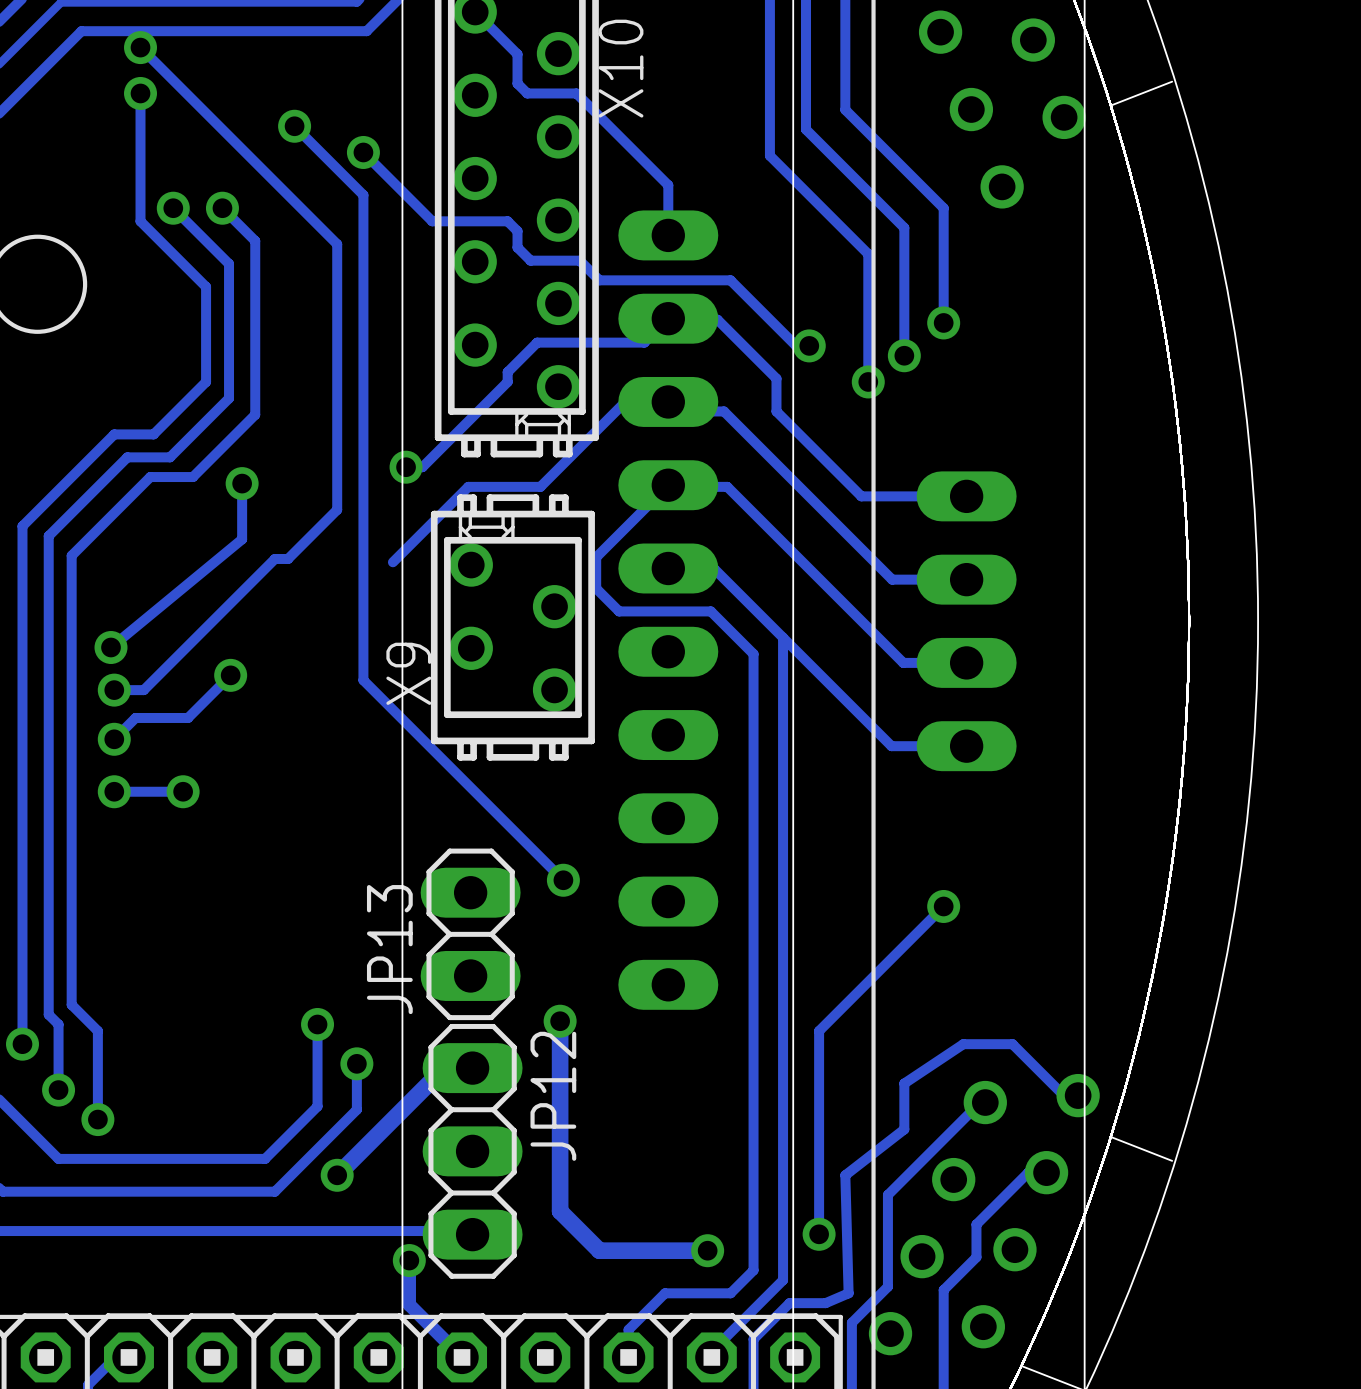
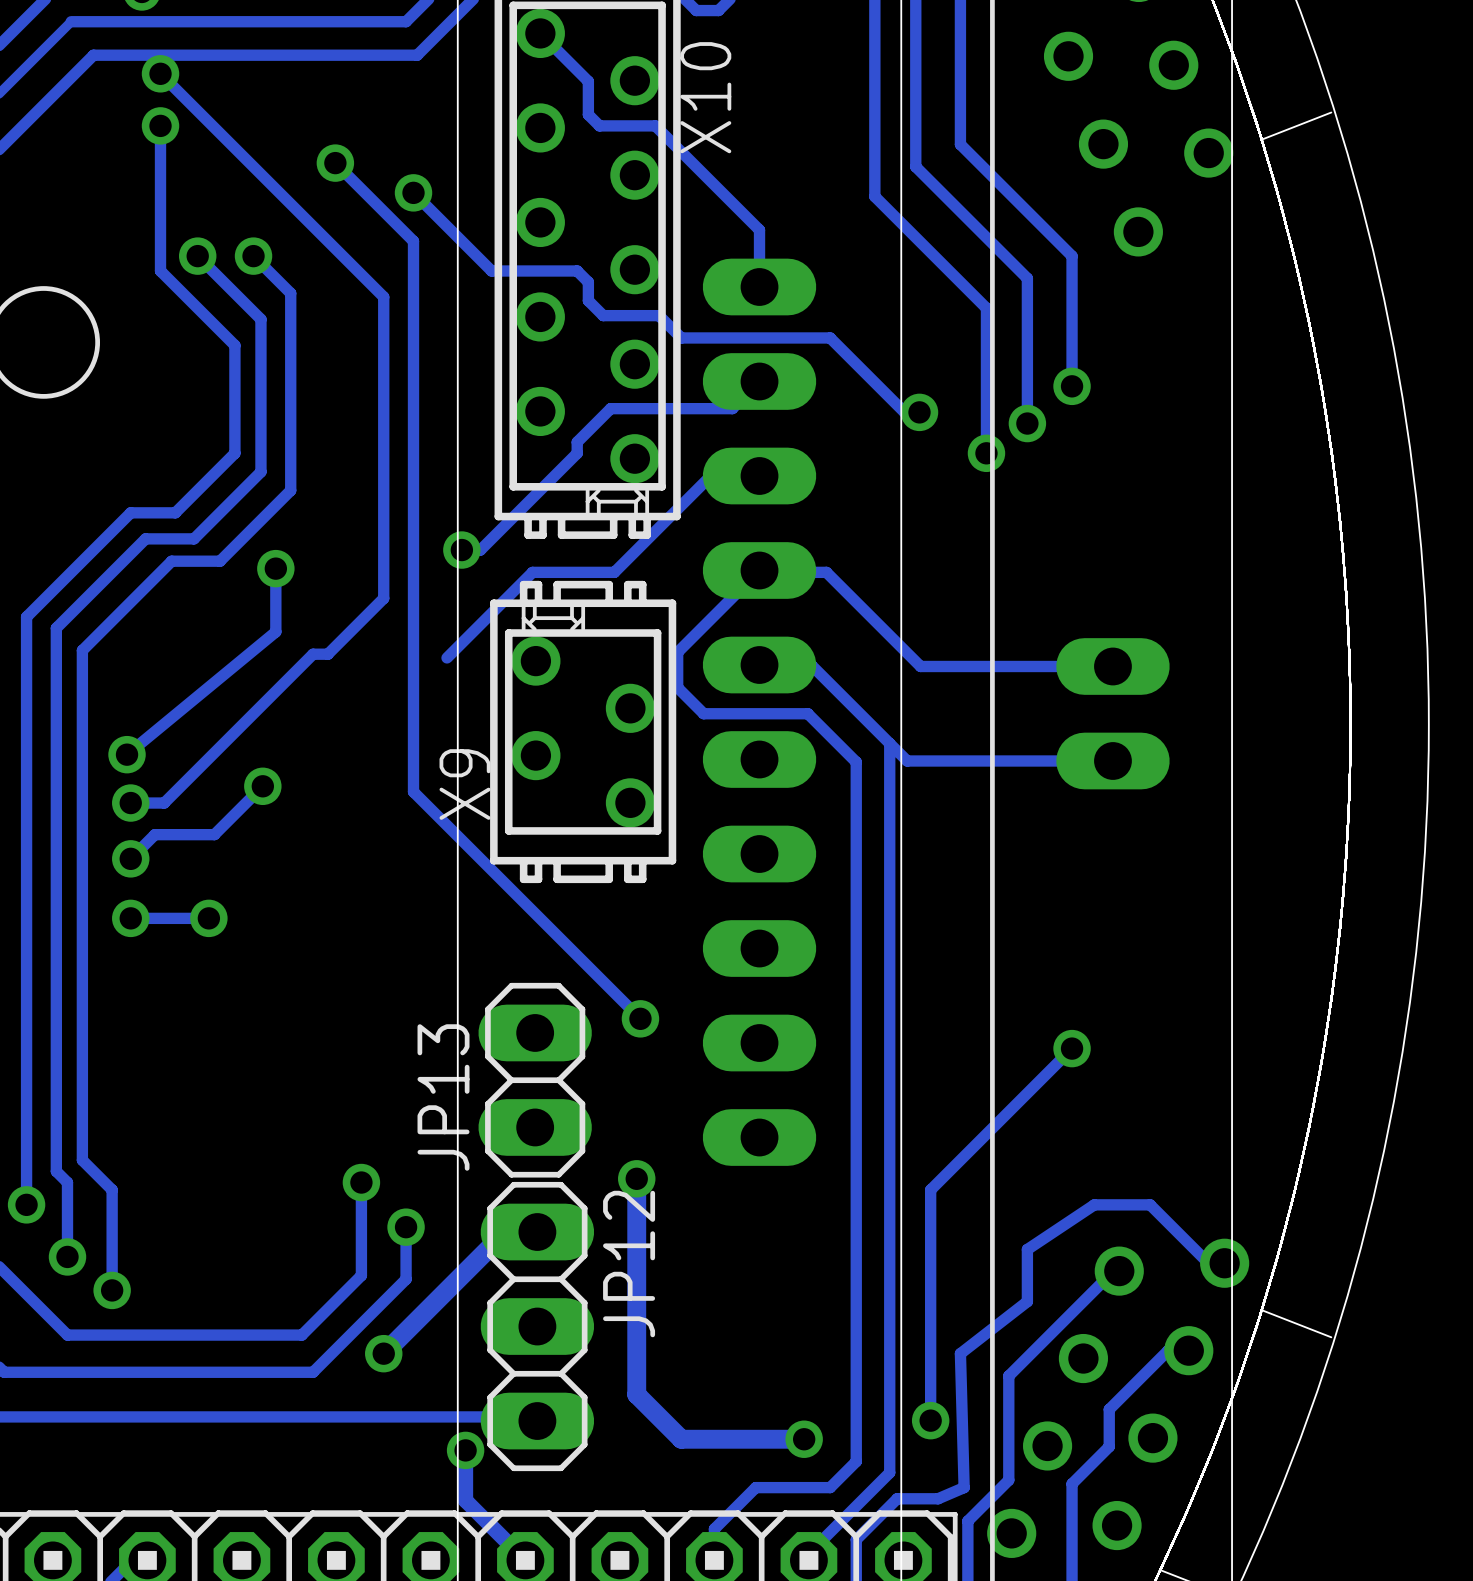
track: (668, 318) (717, 319) (776, 378) (776, 411) (861, 496) (966, 496) -> none
track: (668, 401) (677, 411) (724, 411) (892, 579) (966, 579) -> none
part footprint: [916, 471, 1017, 772] -> [1056, 638, 1170, 790]
track: (810, 569) (903, 662) (966, 662) -> (920, 666) (1112, 666)
track: (798, 653) (891, 746) (966, 746) -> (907, 760) (1112, 760)

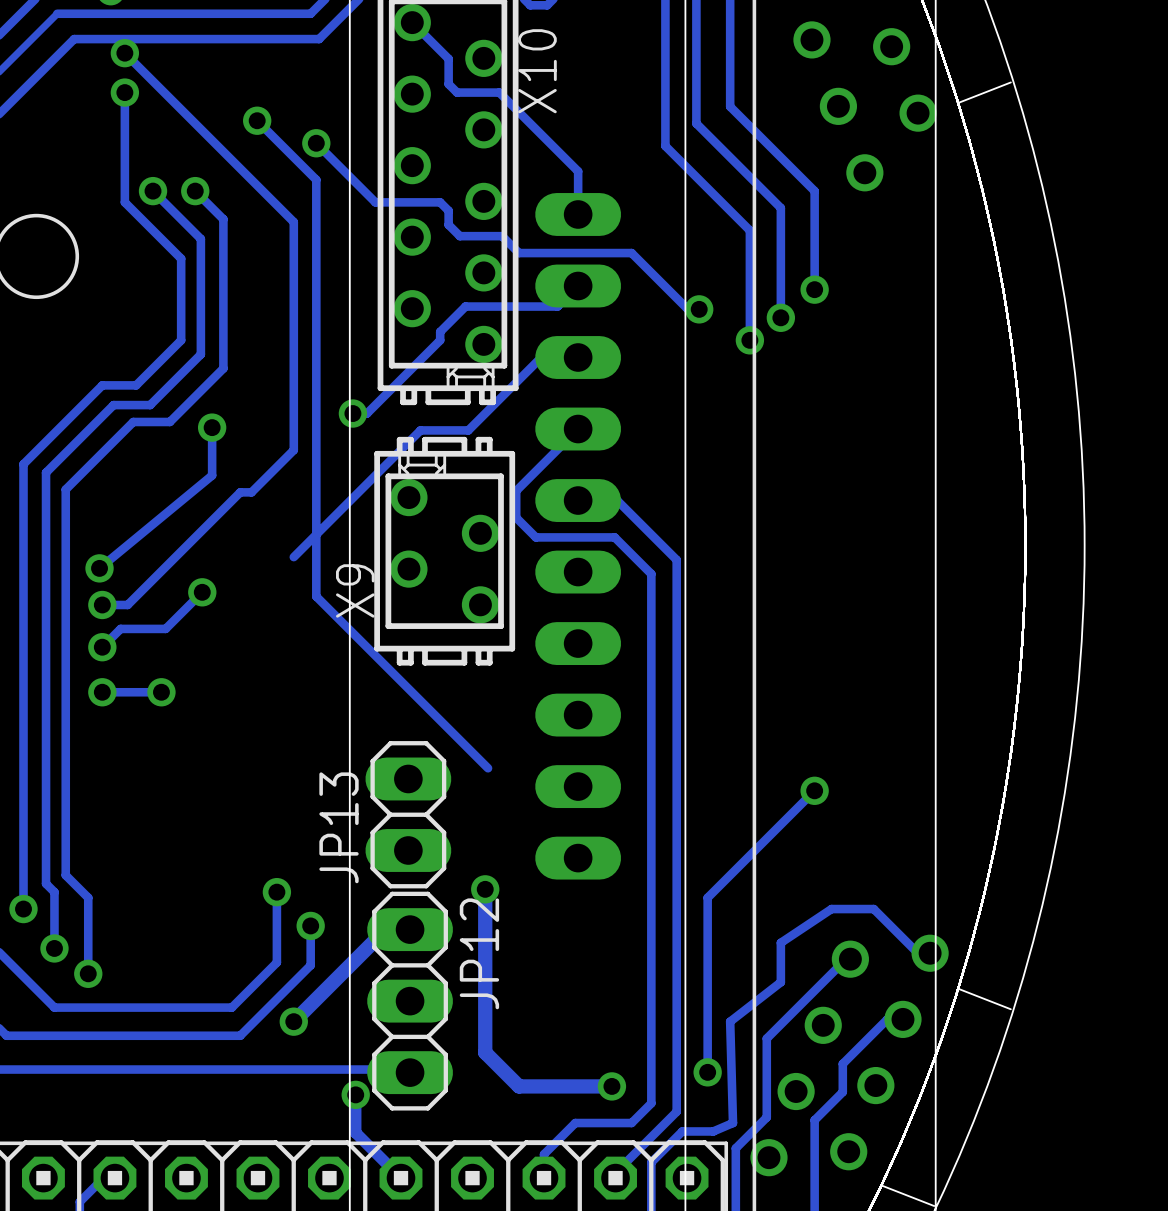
track: (759, 570) (761, 572) (826, 572) (920, 666) (1112, 666) -> none
track: (551, 572) (532, 572) (446, 657) -> (420, 430) (293, 557)
part: (1112, 713) -> none
track: (889, 743) (907, 760) (1112, 760) -> none
via: (640, 1018) -> none

